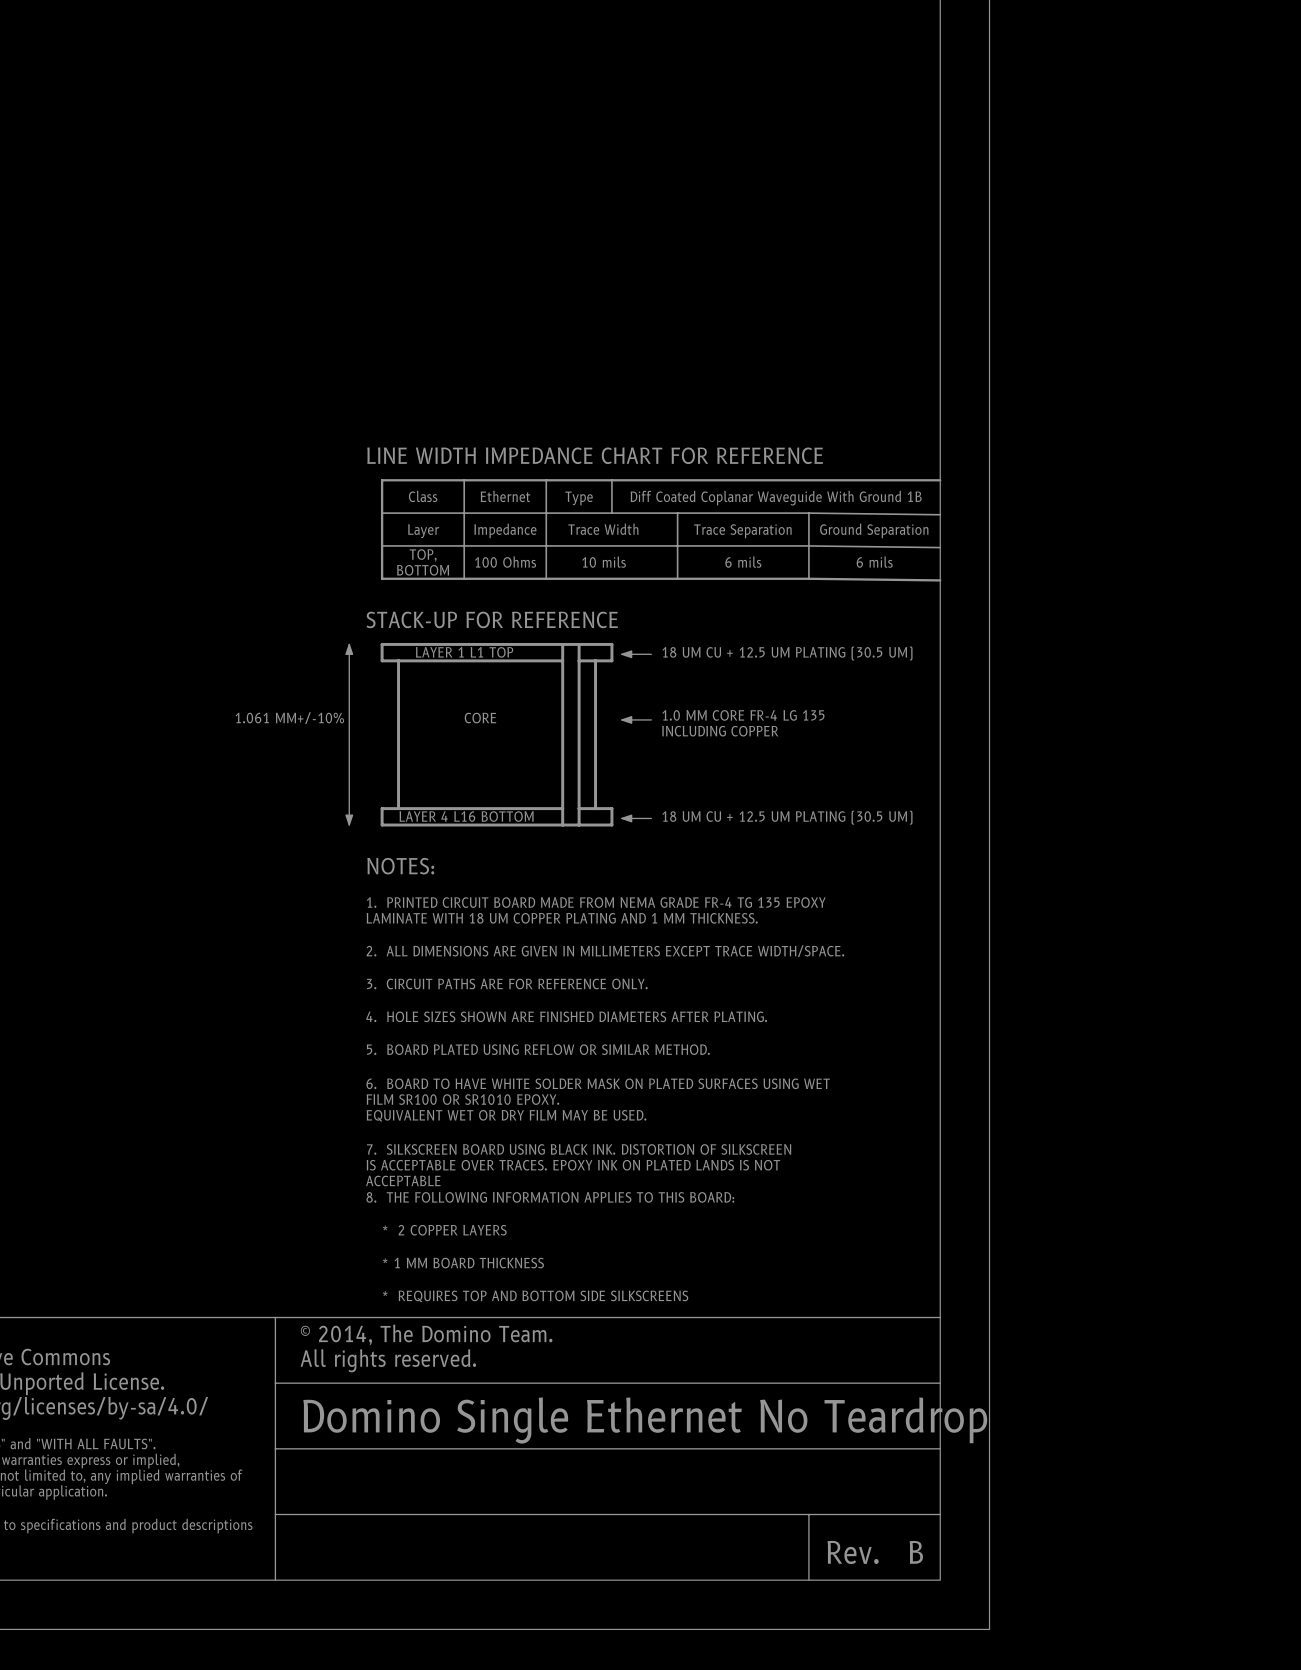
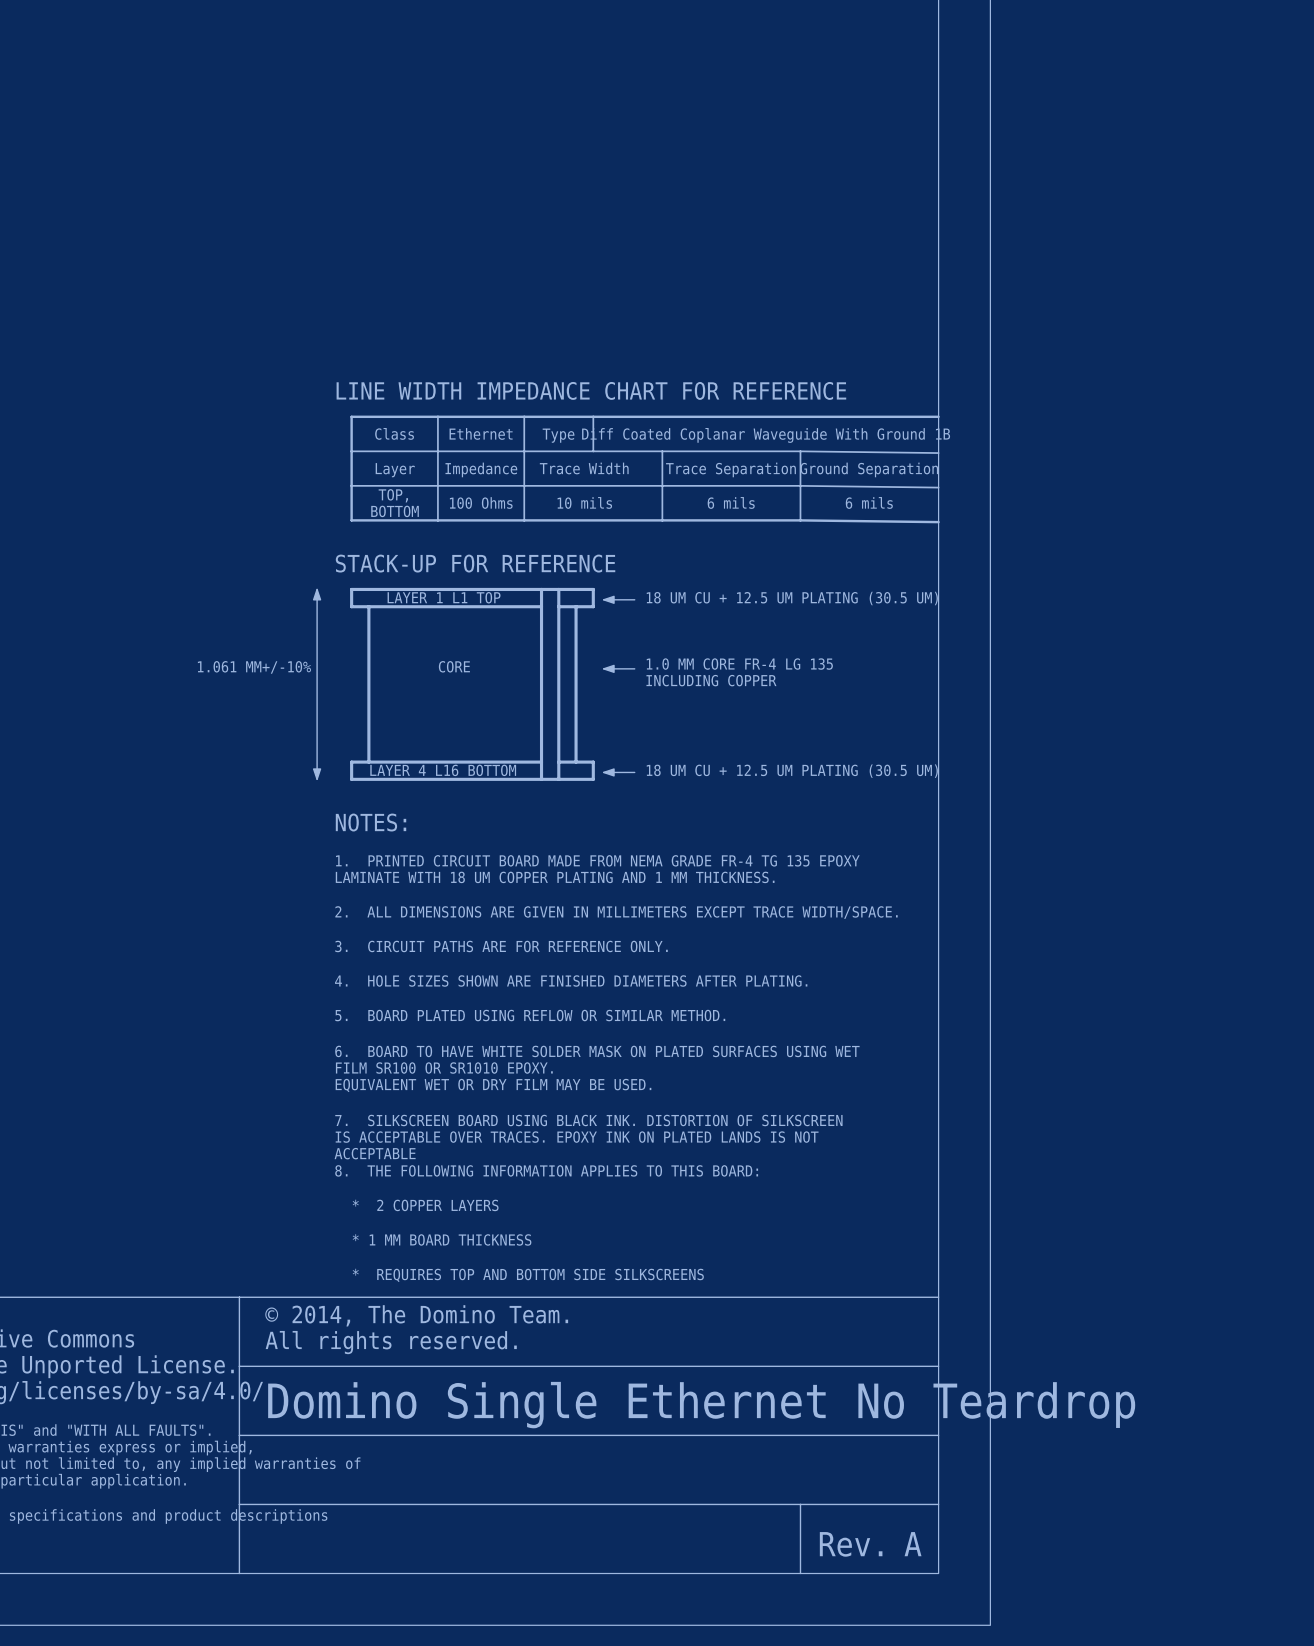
text: B (916, 1552) -> A (913, 1544)

